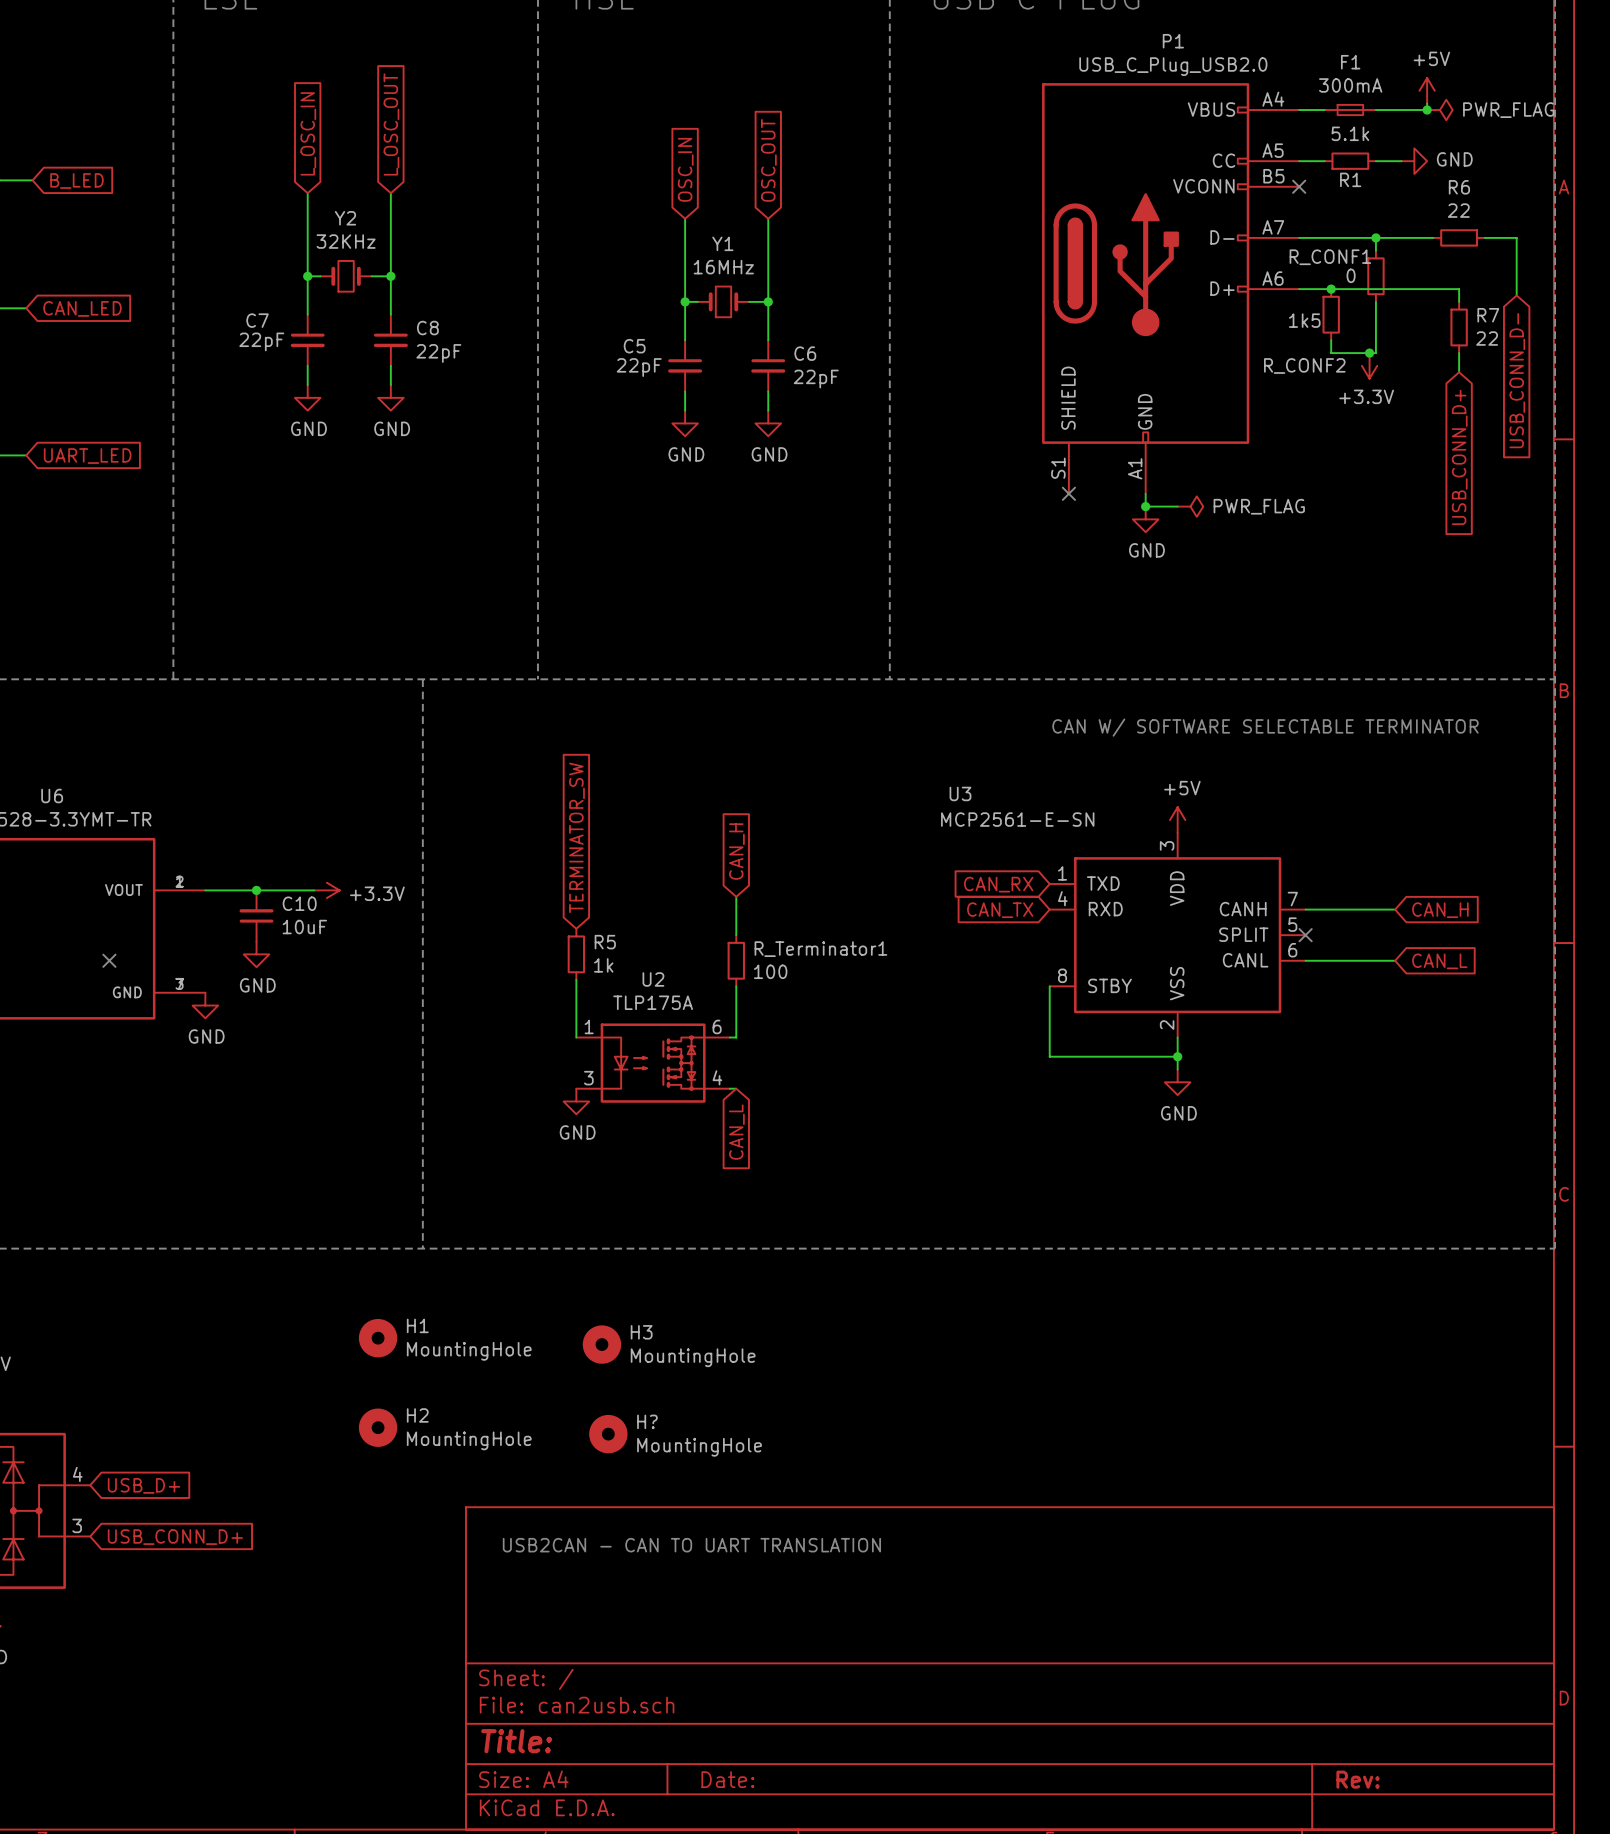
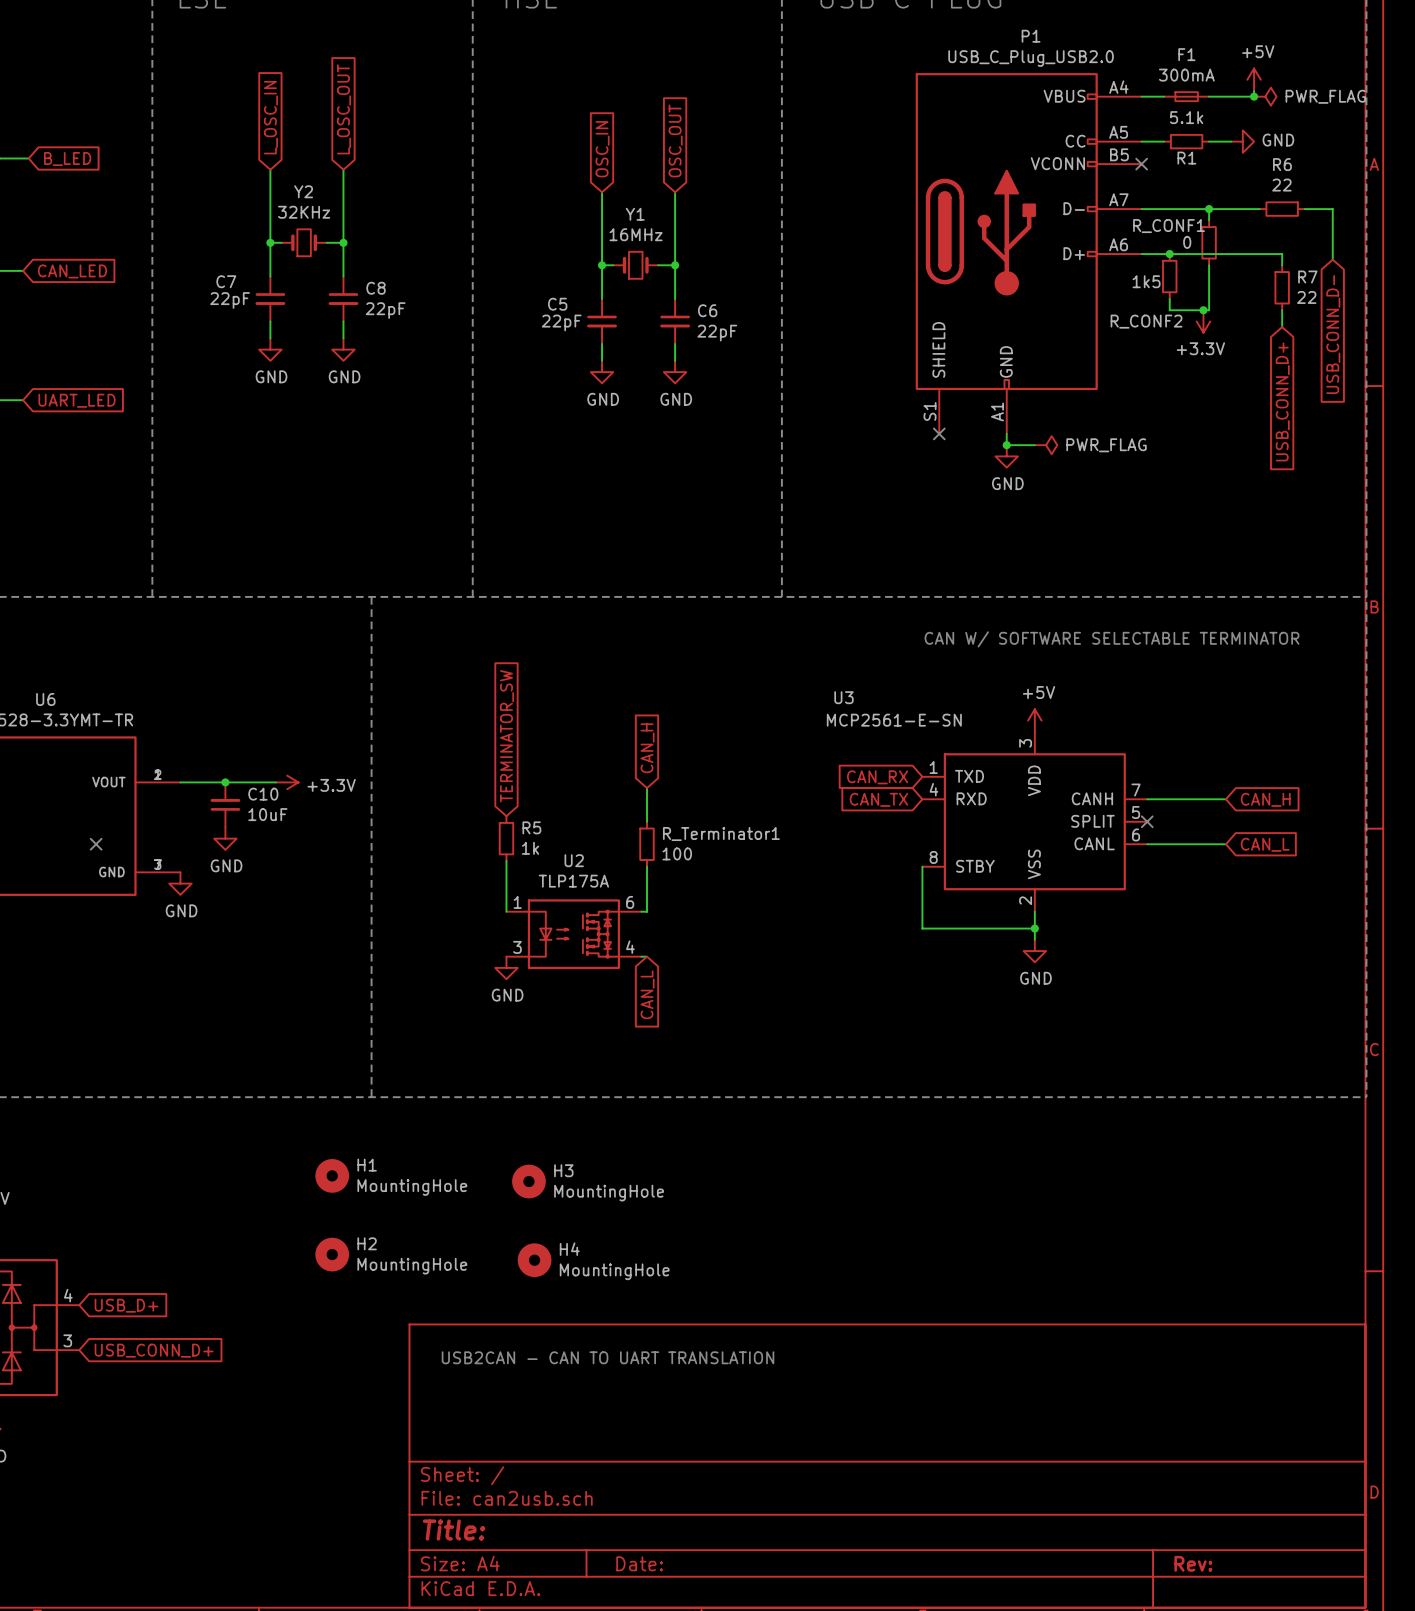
H? name: H? (647, 1421) -> H4 (569, 1249)

